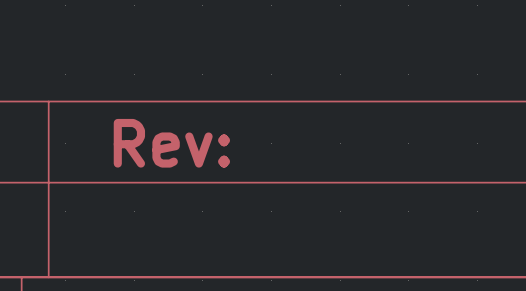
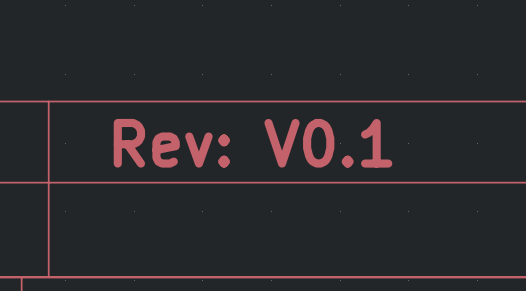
title block: Rev: (171, 143) -> Rev: V0.1 (253, 143)

